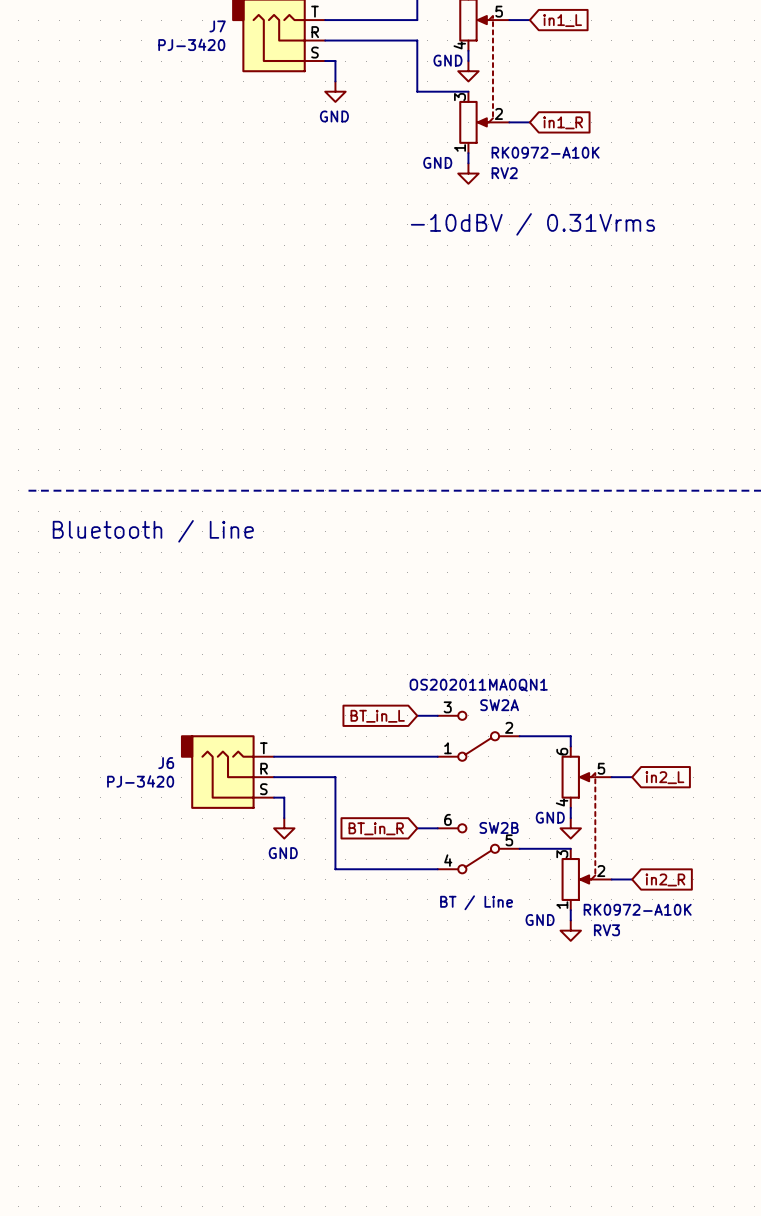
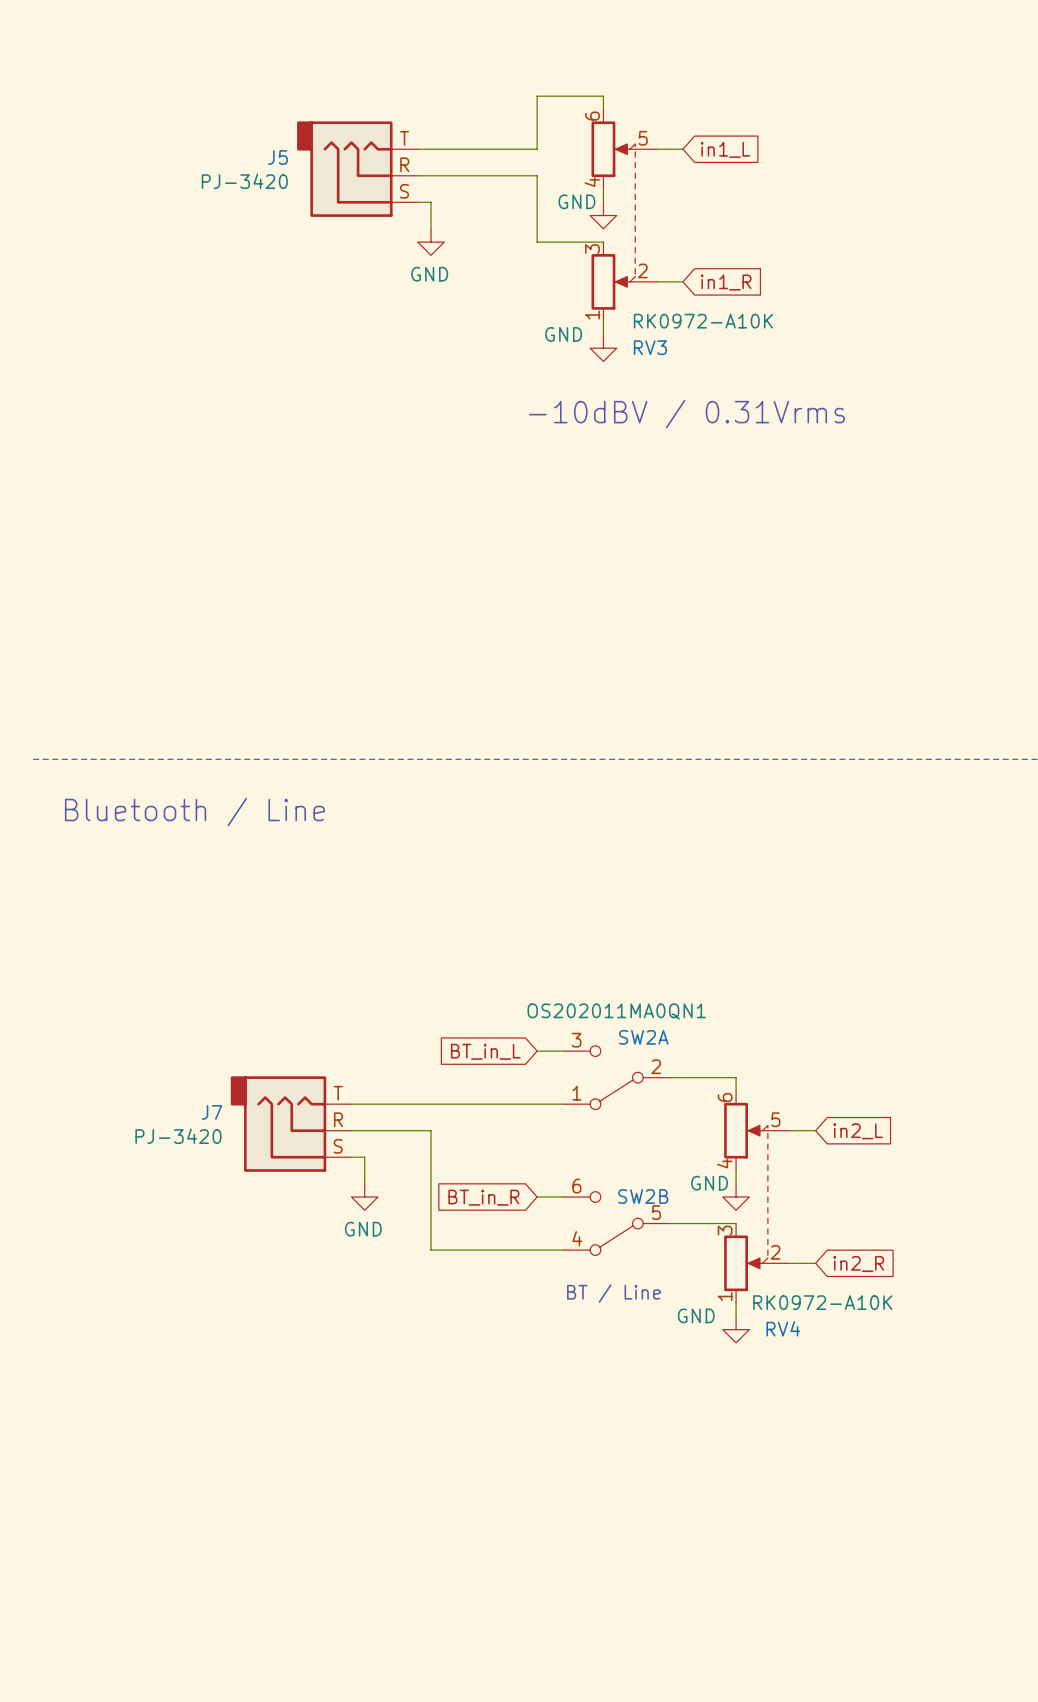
J7 name: J7 (217, 26) -> J5 (277, 157)
RV2 name: RV2 (504, 173) -> RV3 (650, 347)
J6 name: J6 (166, 763) -> J7 (211, 1112)
RV3 name: RV3 (606, 930) -> RV4 (783, 1328)

